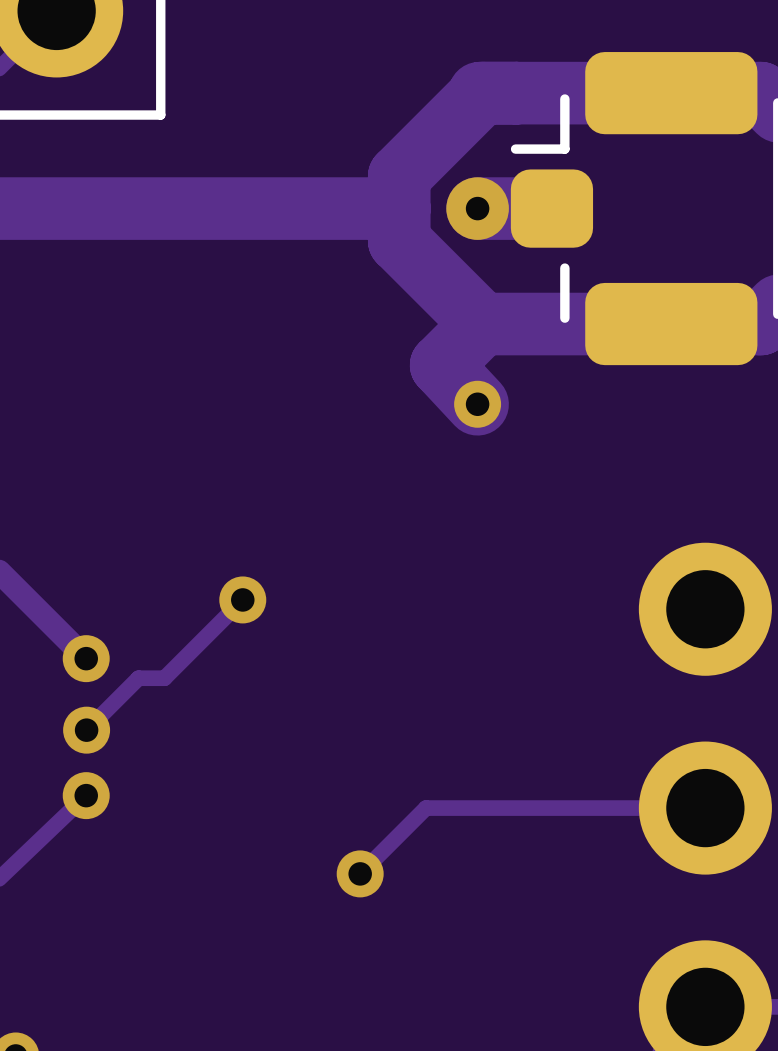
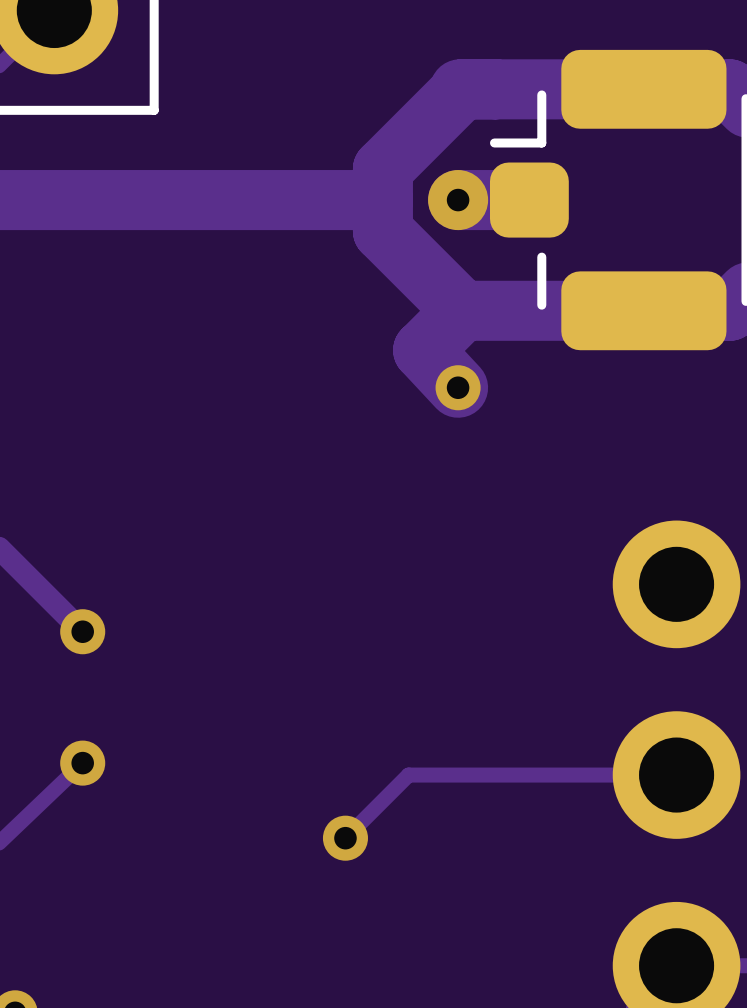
track: (242, 599) (164, 678) (138, 678) (86, 730) -> none
via: (242, 599) -> none
via: (86, 730) -> none

